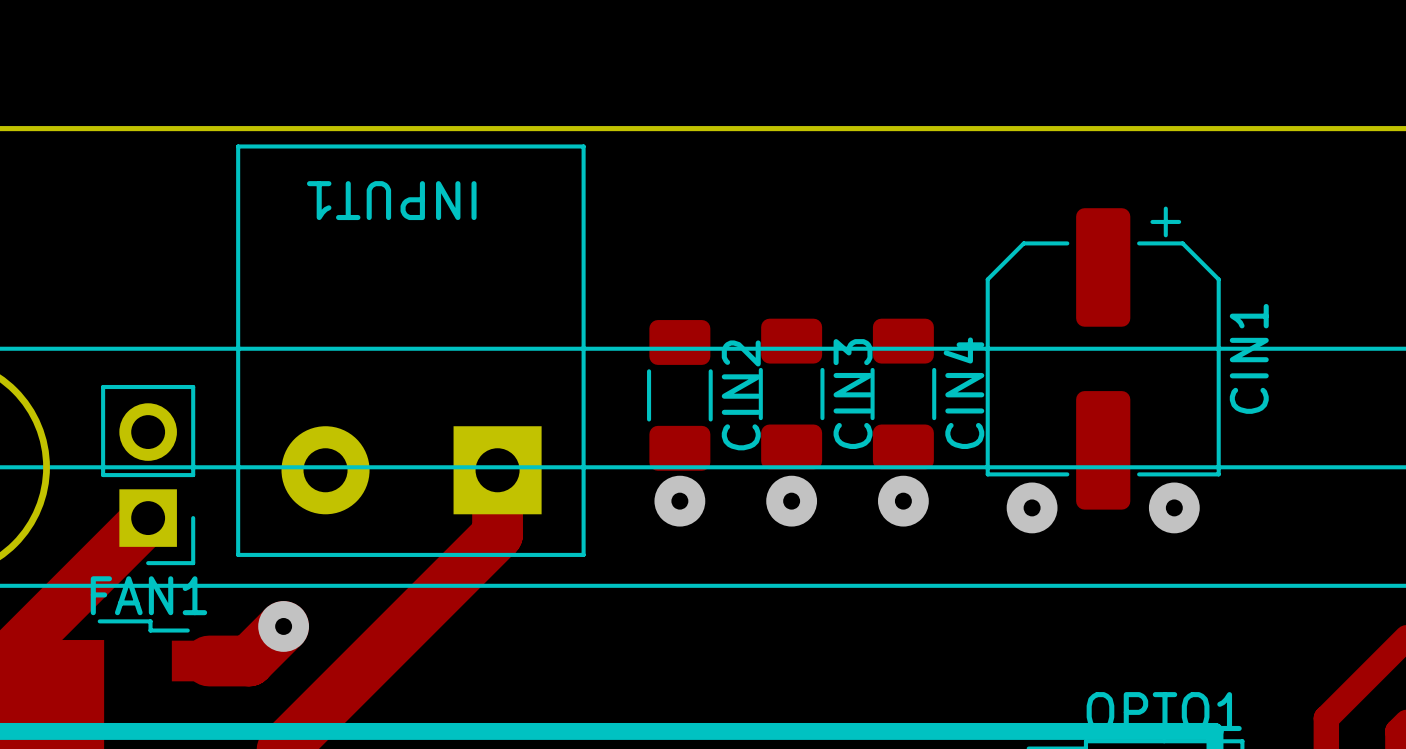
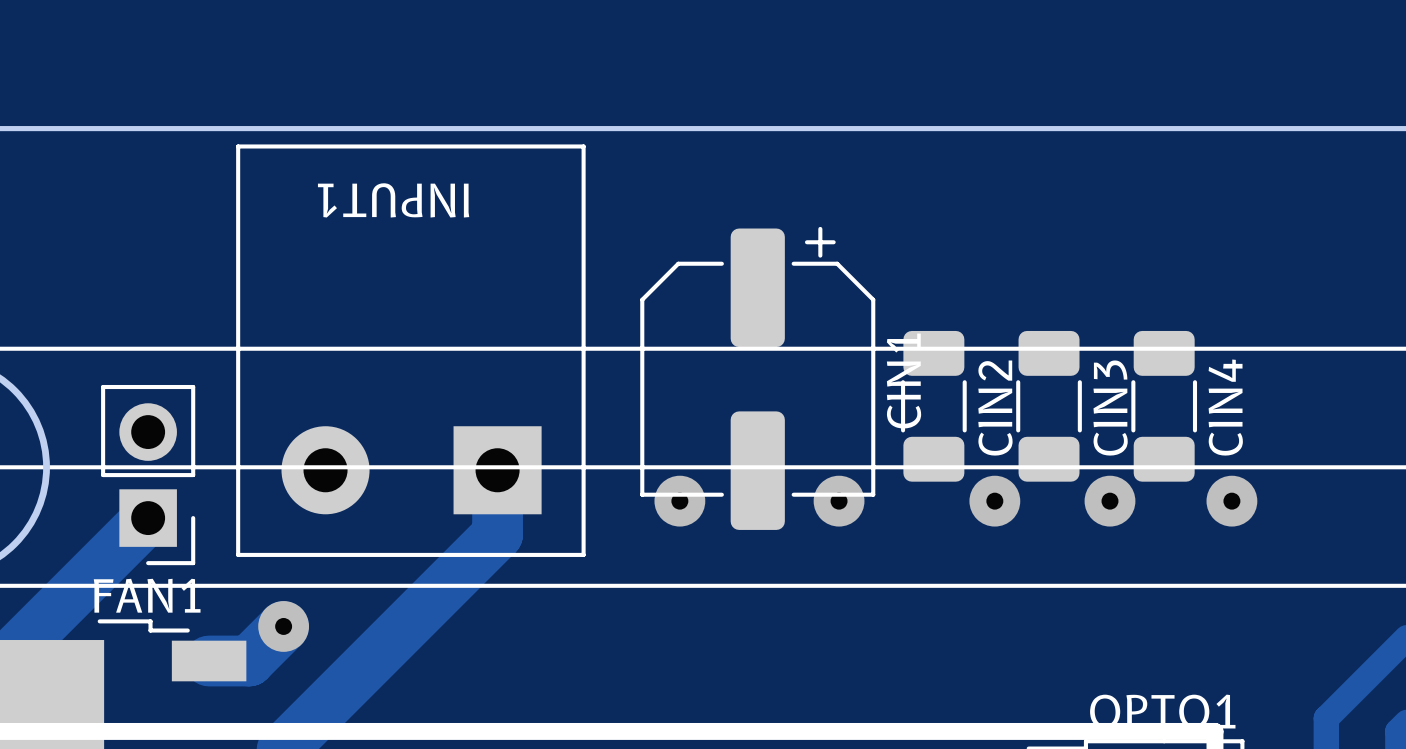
CIN1 position: (1103, 358) -> (757, 378)
CIN3 position: (791, 394) -> (1049, 406)
CIN4 position: (903, 394) -> (1164, 406)
CIN2 position: (679, 395) -> (933, 406)
via: (791, 501) -> none
via: none -> (839, 501)
via: (903, 501) -> none
via: none -> (1109, 501)
via: none -> (1231, 501)
via position: (1032, 507) -> (994, 501)
via: (1174, 507) -> none

